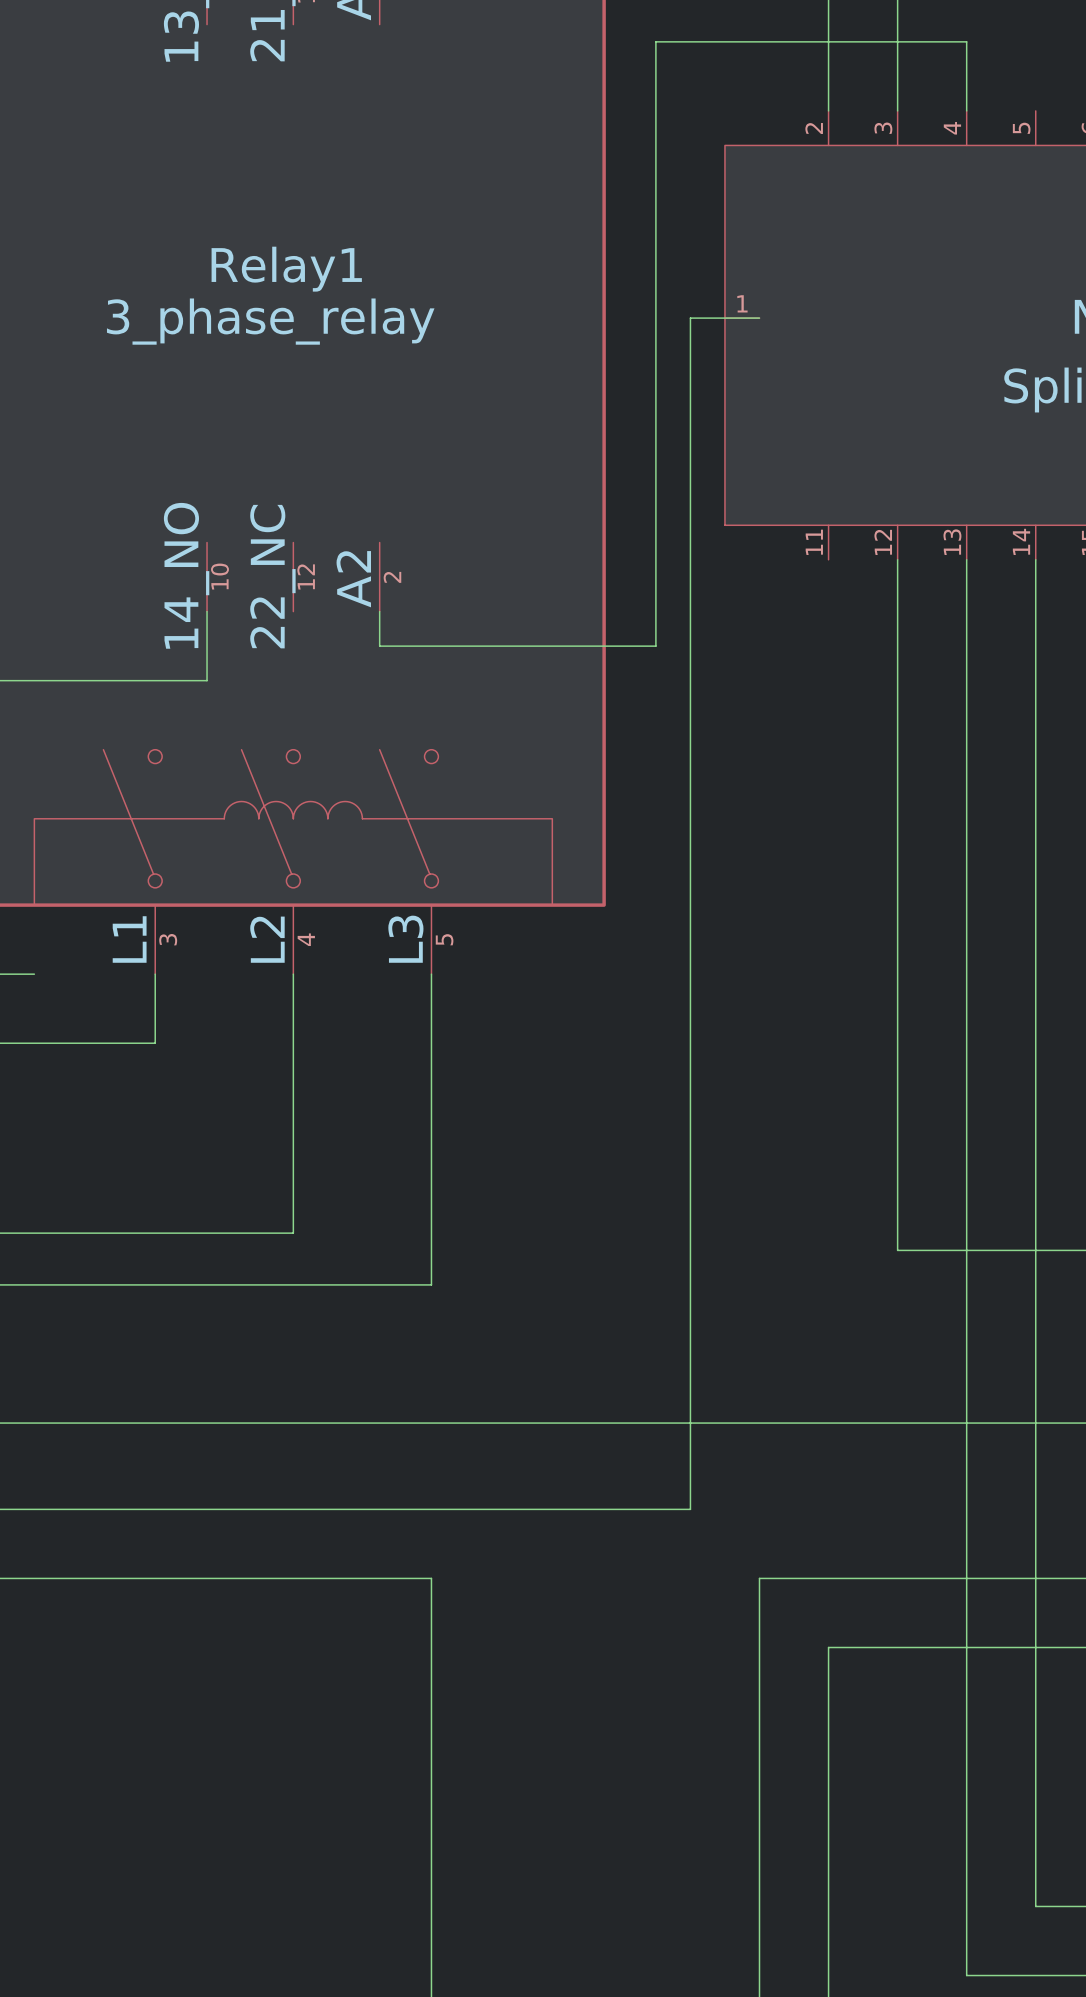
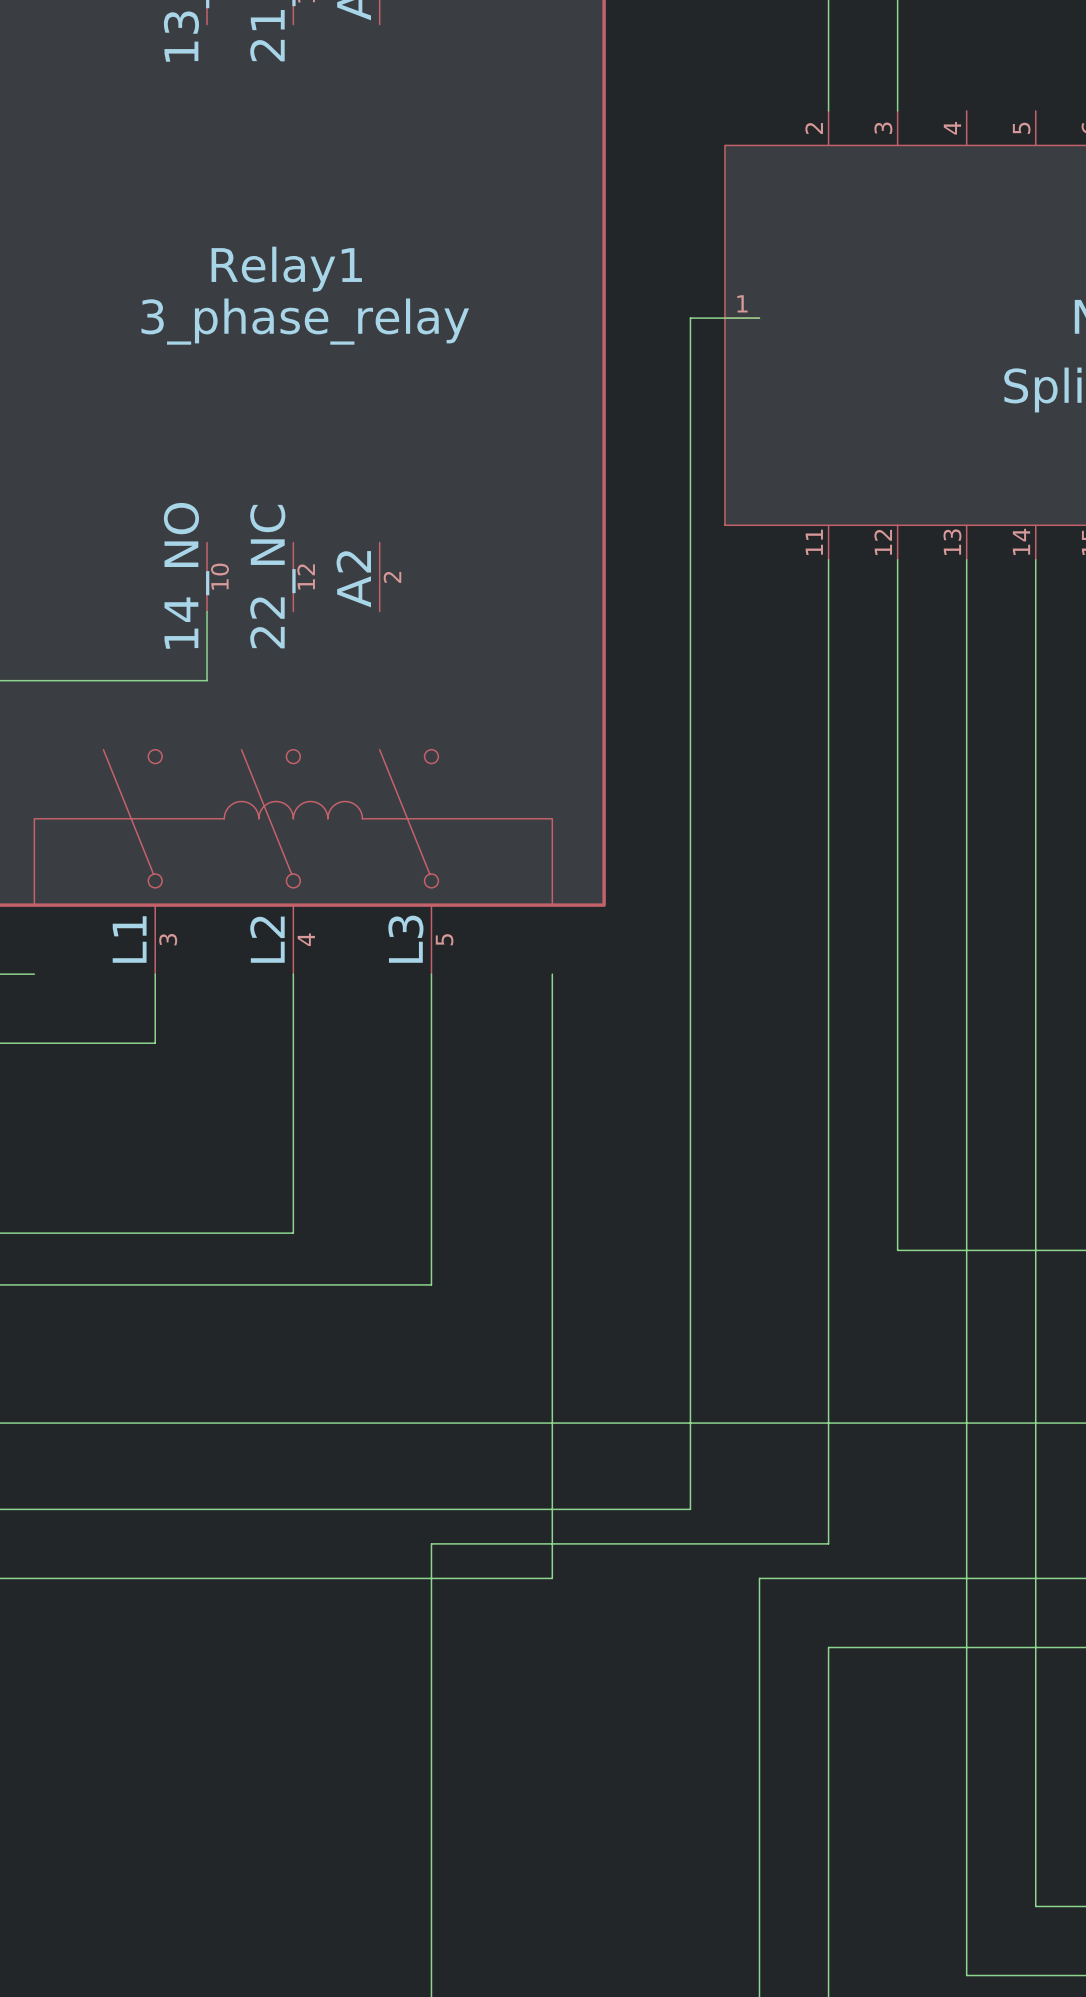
wire: (966, 110) (966, 41) (655, 41) (655, 646) (379, 646) (379, 611) -> none
Relay1 value position: 3_phase_relay (270, 321) -> 3_phase_relay (305, 321)
wire: none -> (828, 559) (828, 1543) (431, 1543) (431, 1578) (552, 1578) (552, 974)

